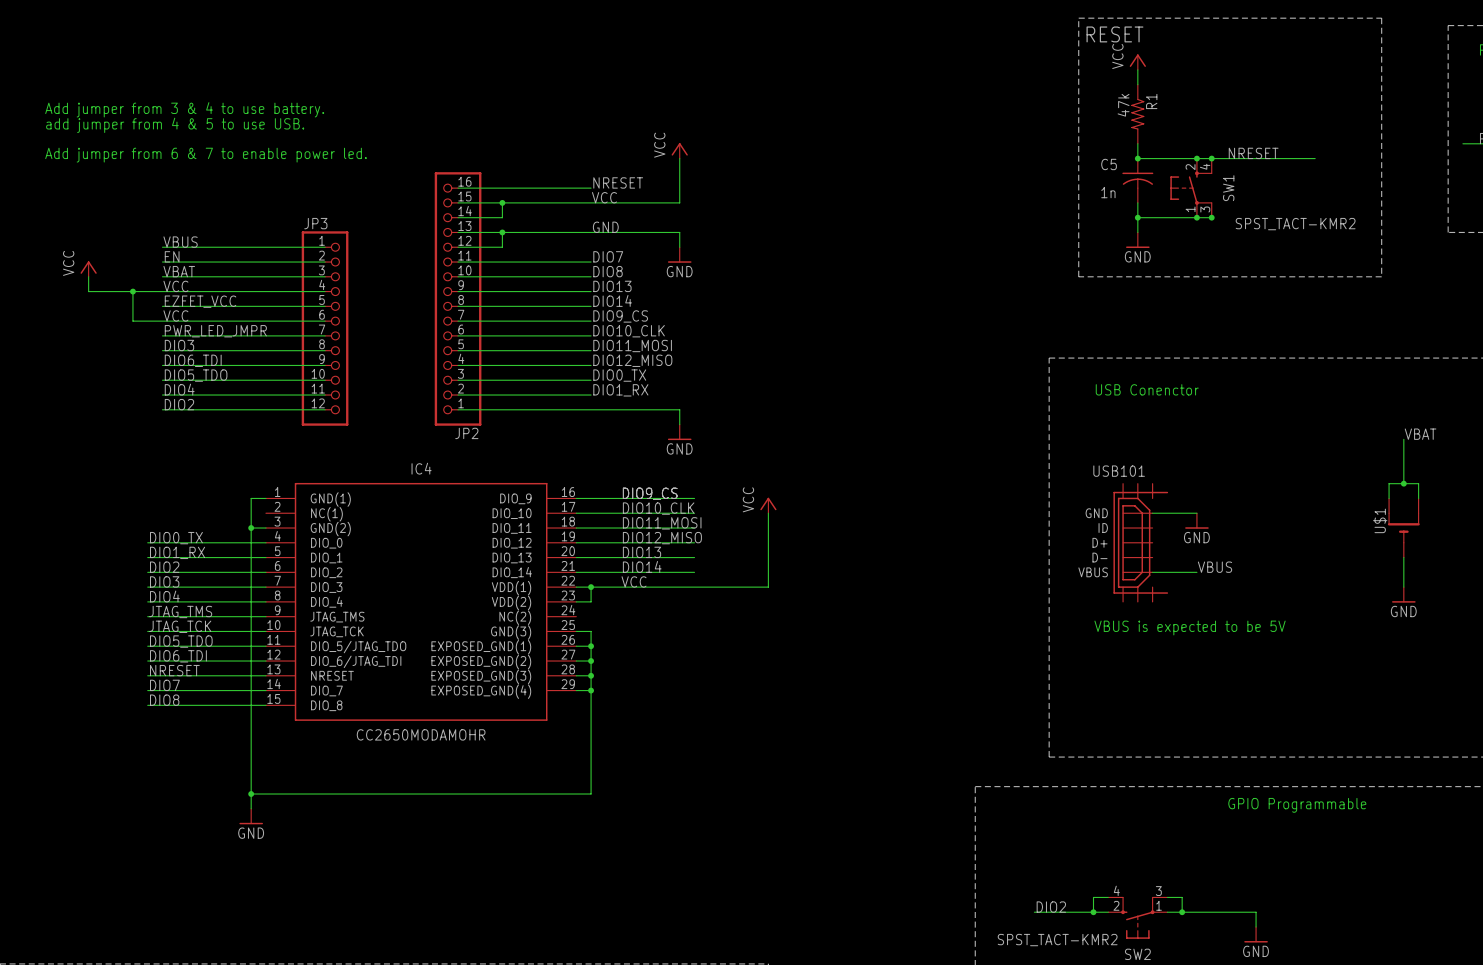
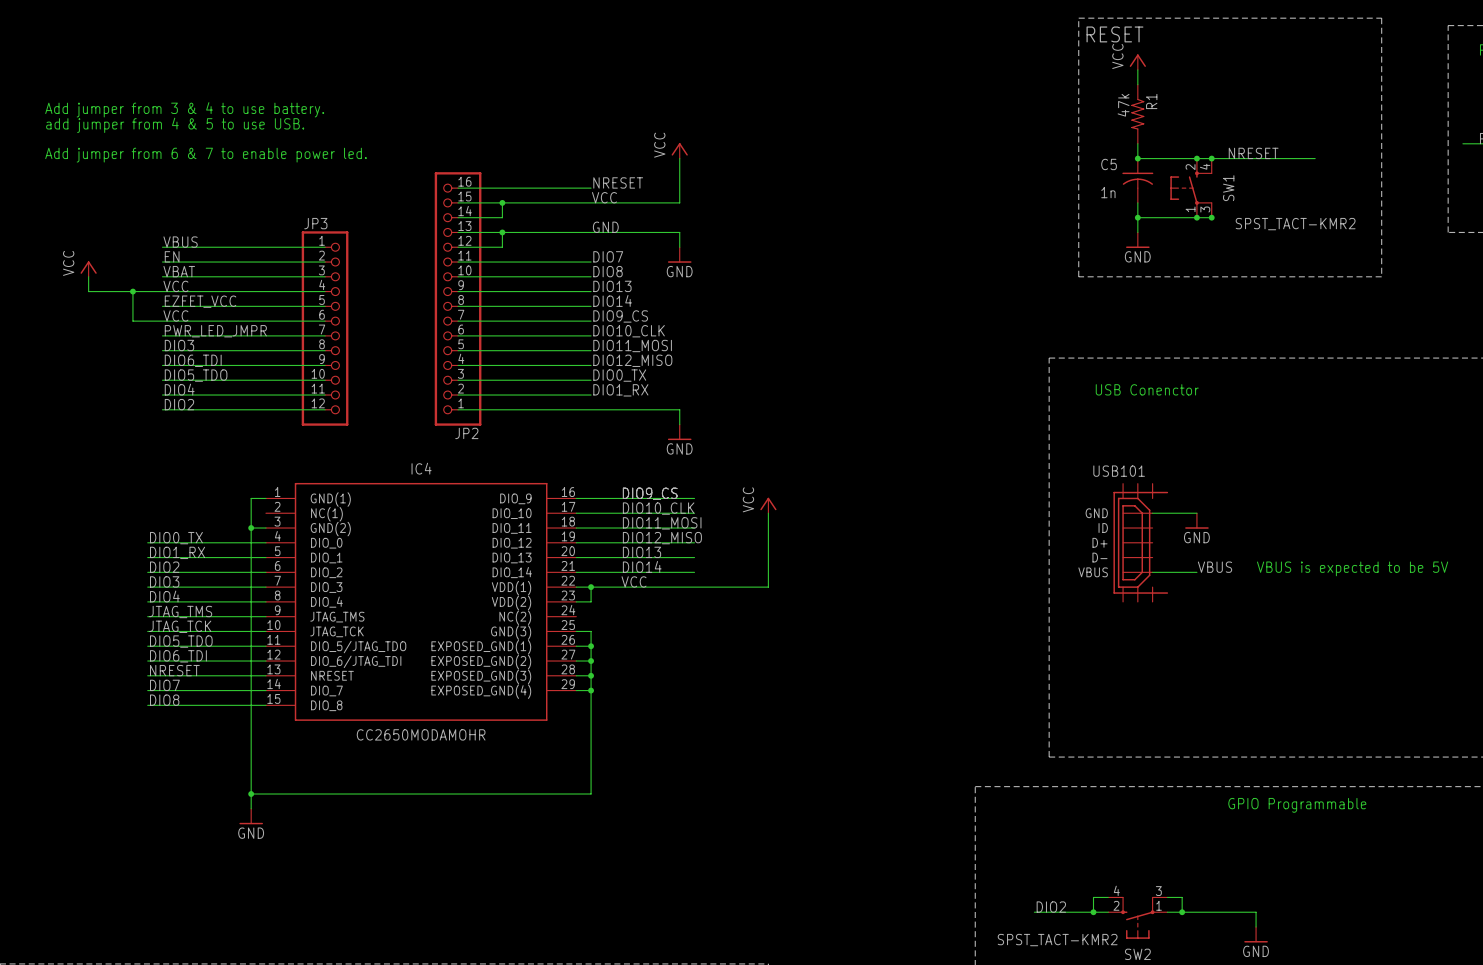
label: VBAT (1420, 434) -> none
wire: (1403, 439) (1403, 483) -> none
junction: (1403, 483) -> none
wire: (1389, 498) (1389, 483) (1418, 483) (1418, 498) -> none
U$1: (1403, 528) -> none
wire: (1403, 557) (1403, 587) -> none
text: none -> VBUS is expected to be 5V (1352, 568)
power symbol: GND (1403, 594) -> none
text: VBUS is expected to be 5V (1190, 628) -> none

